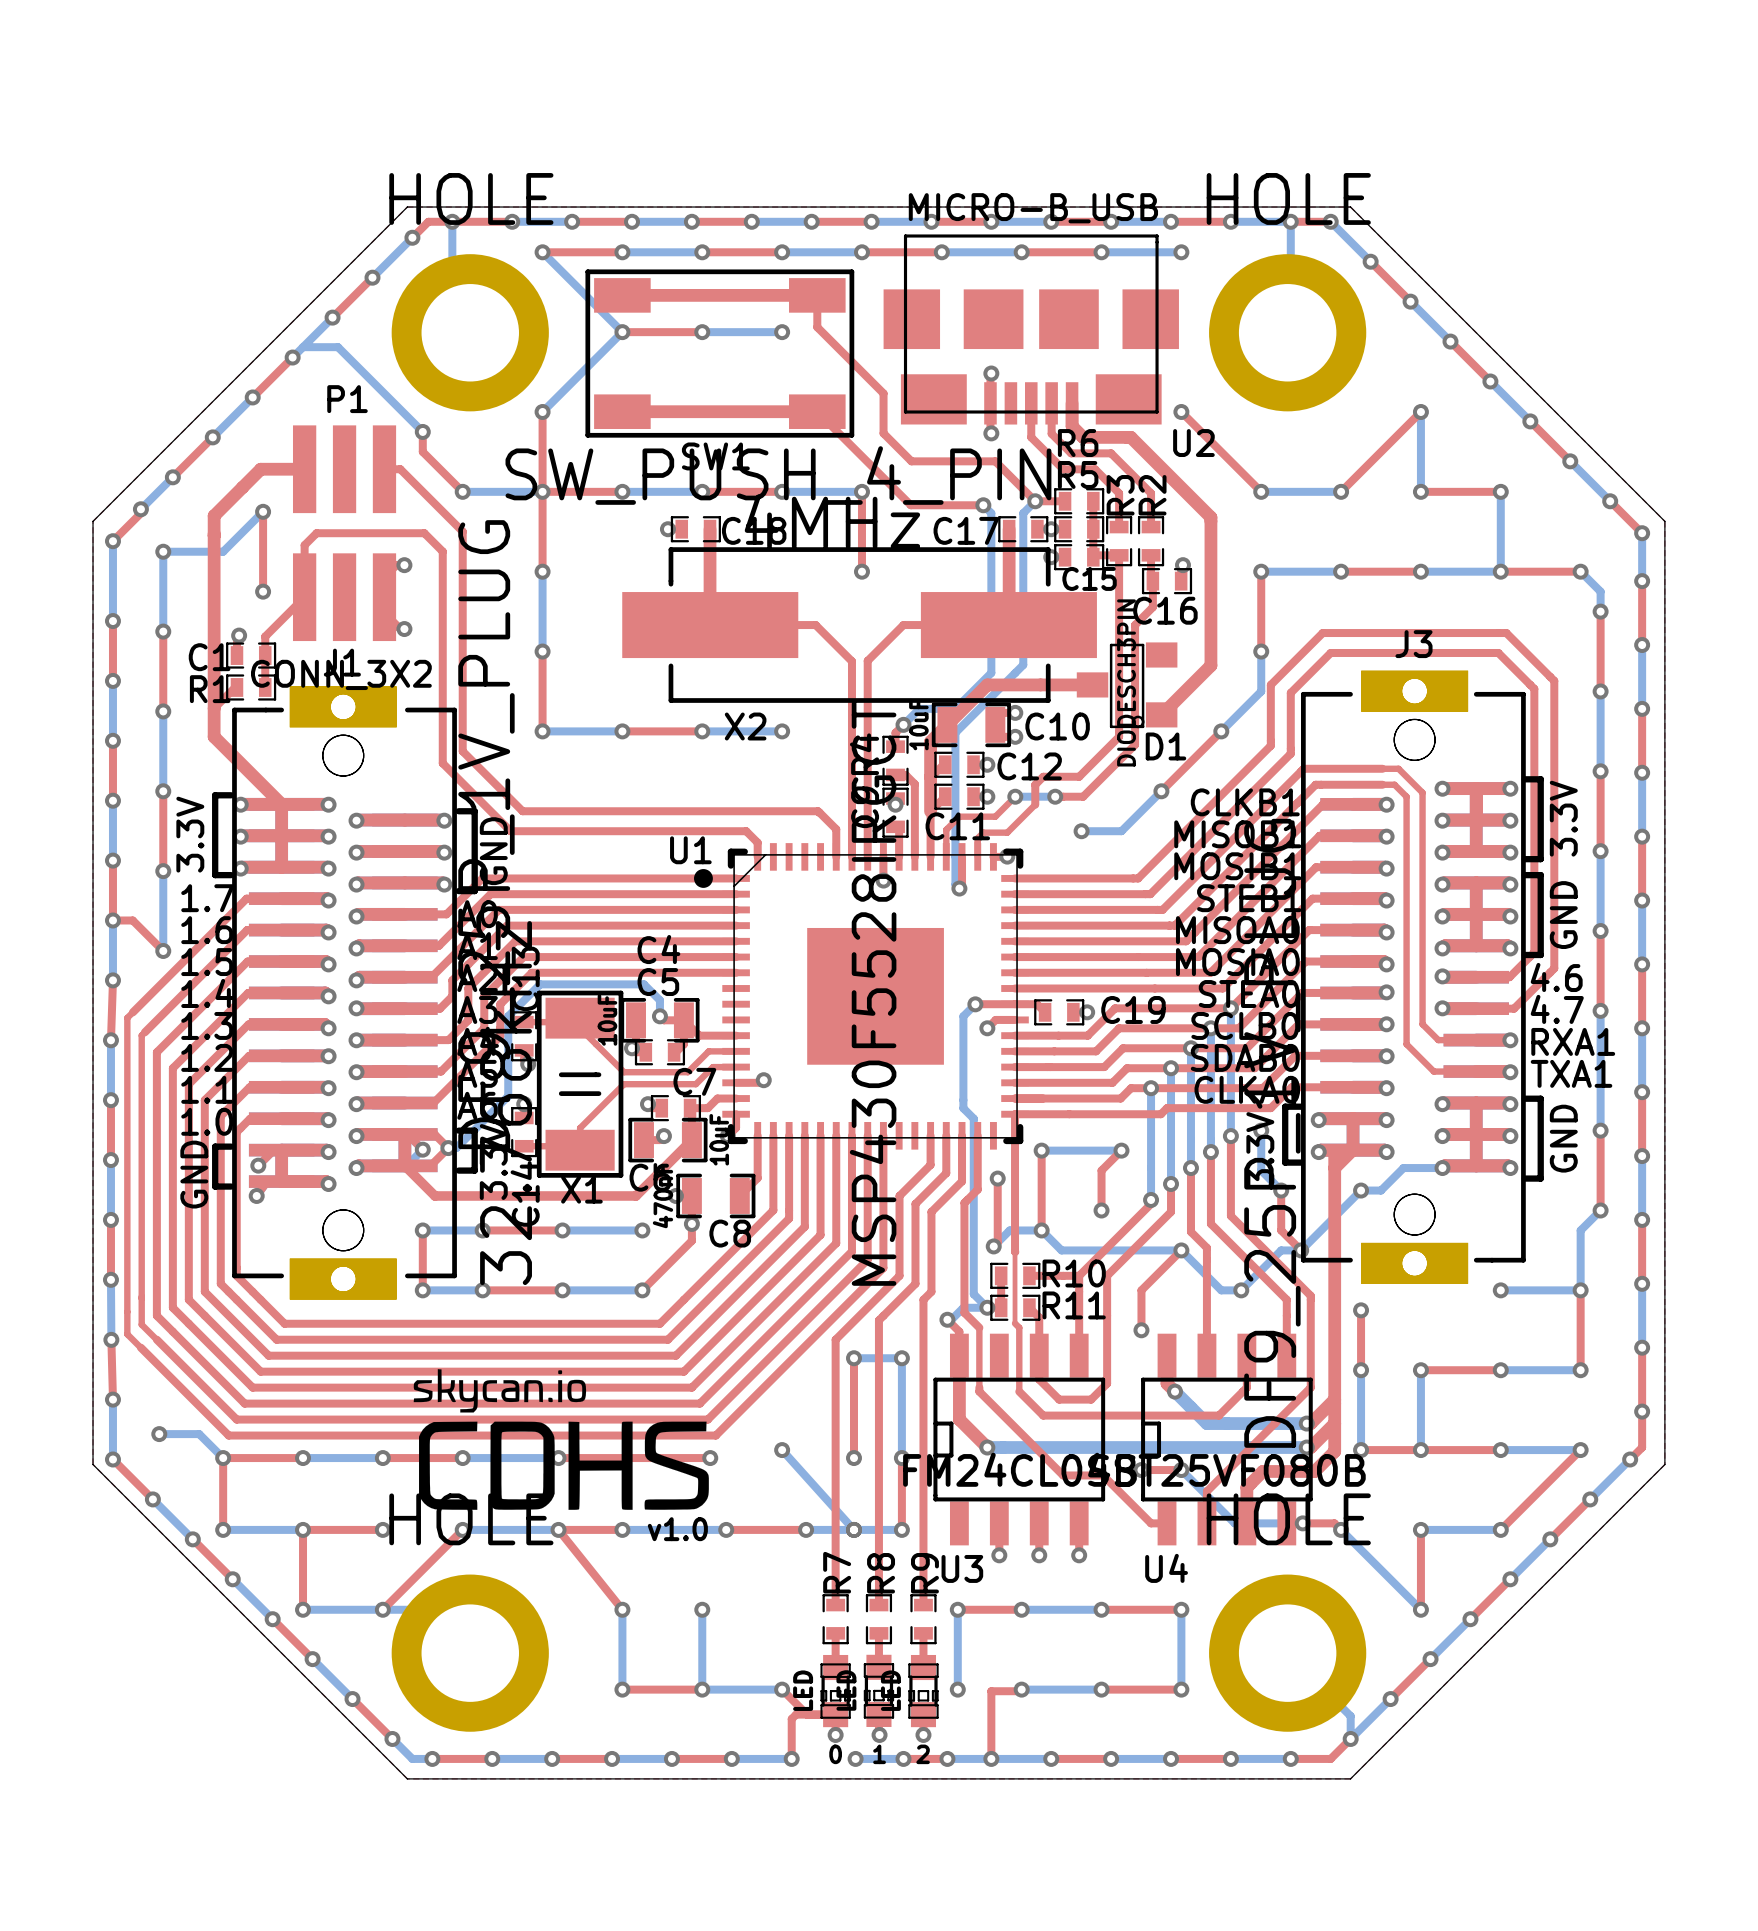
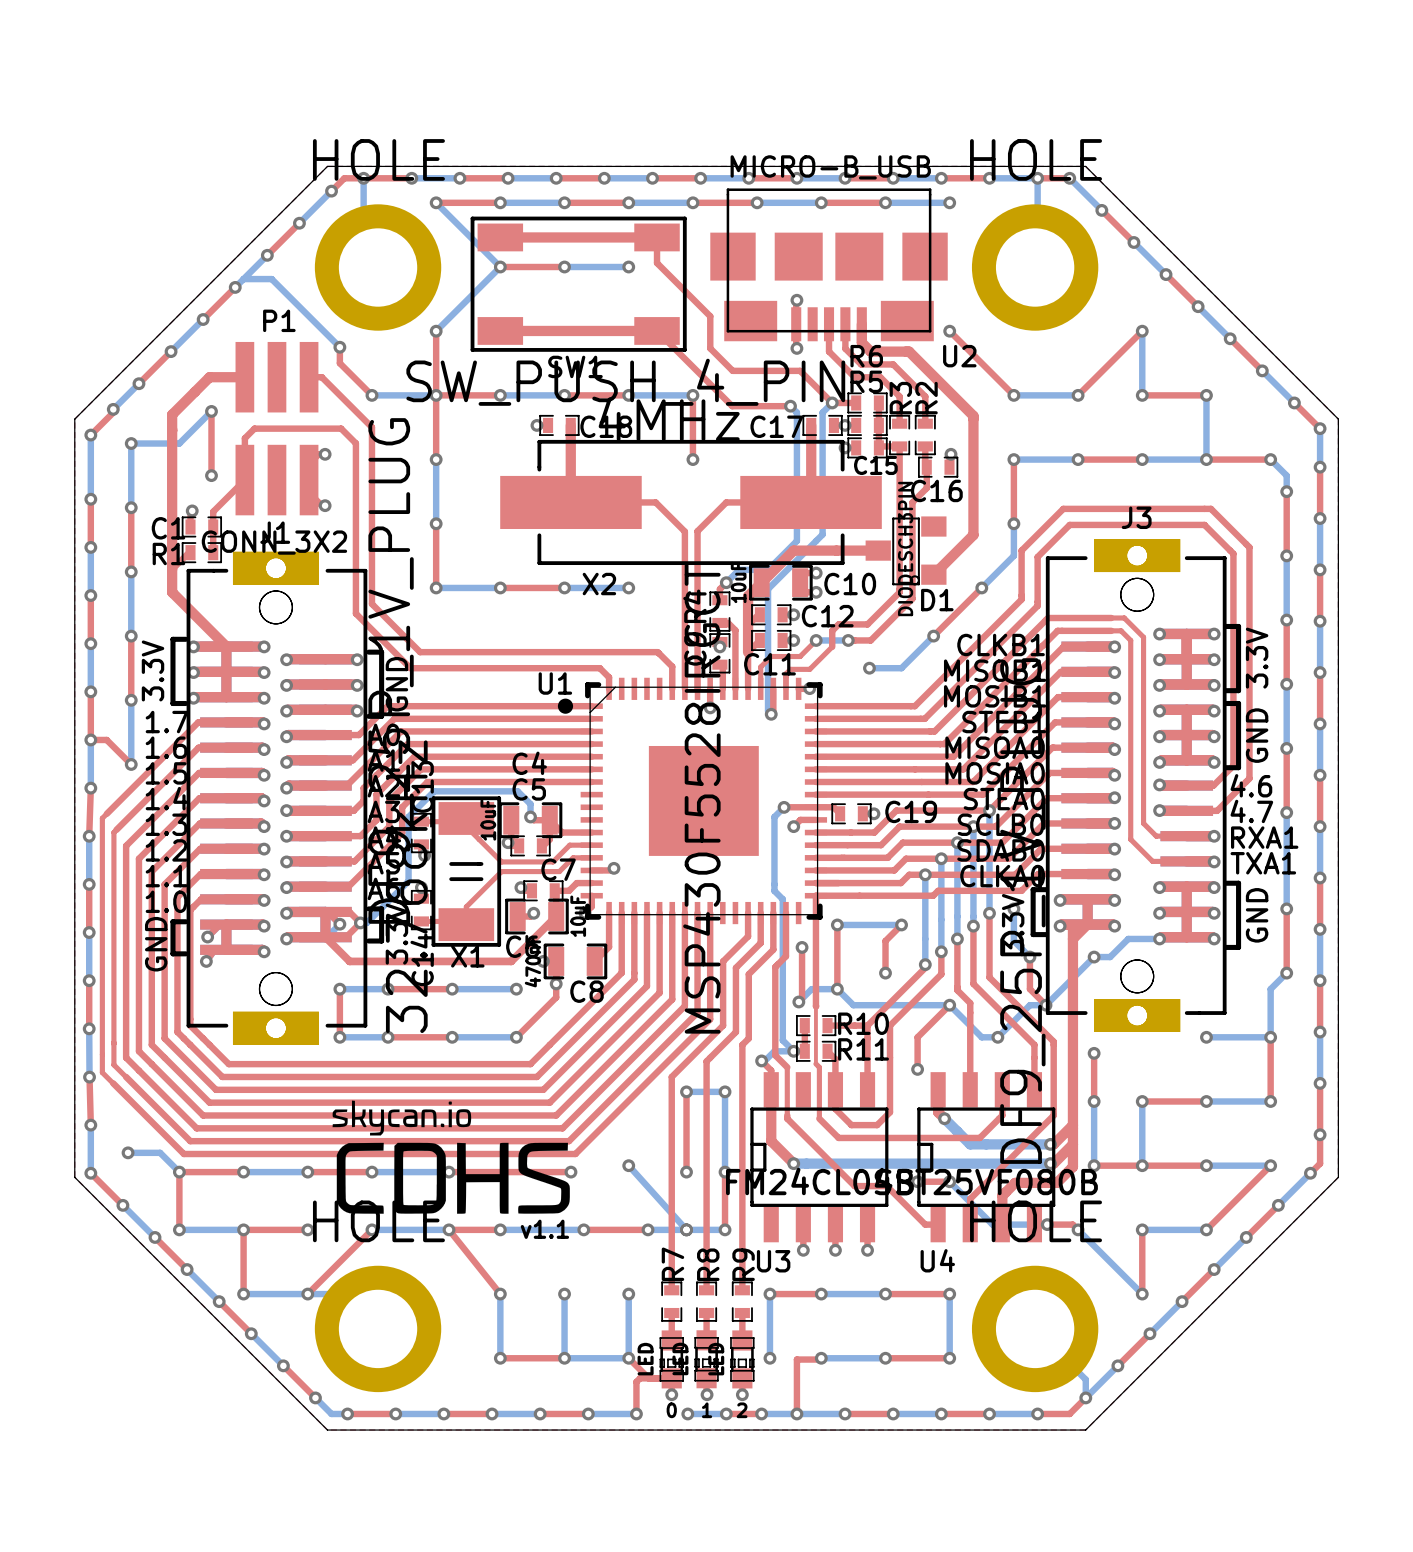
text: v1.0 (677, 1529) -> v1.1 (544, 1229)
bottom track: none -> (628, 1294) (628, 1358)
via: none -> (628, 1294)

